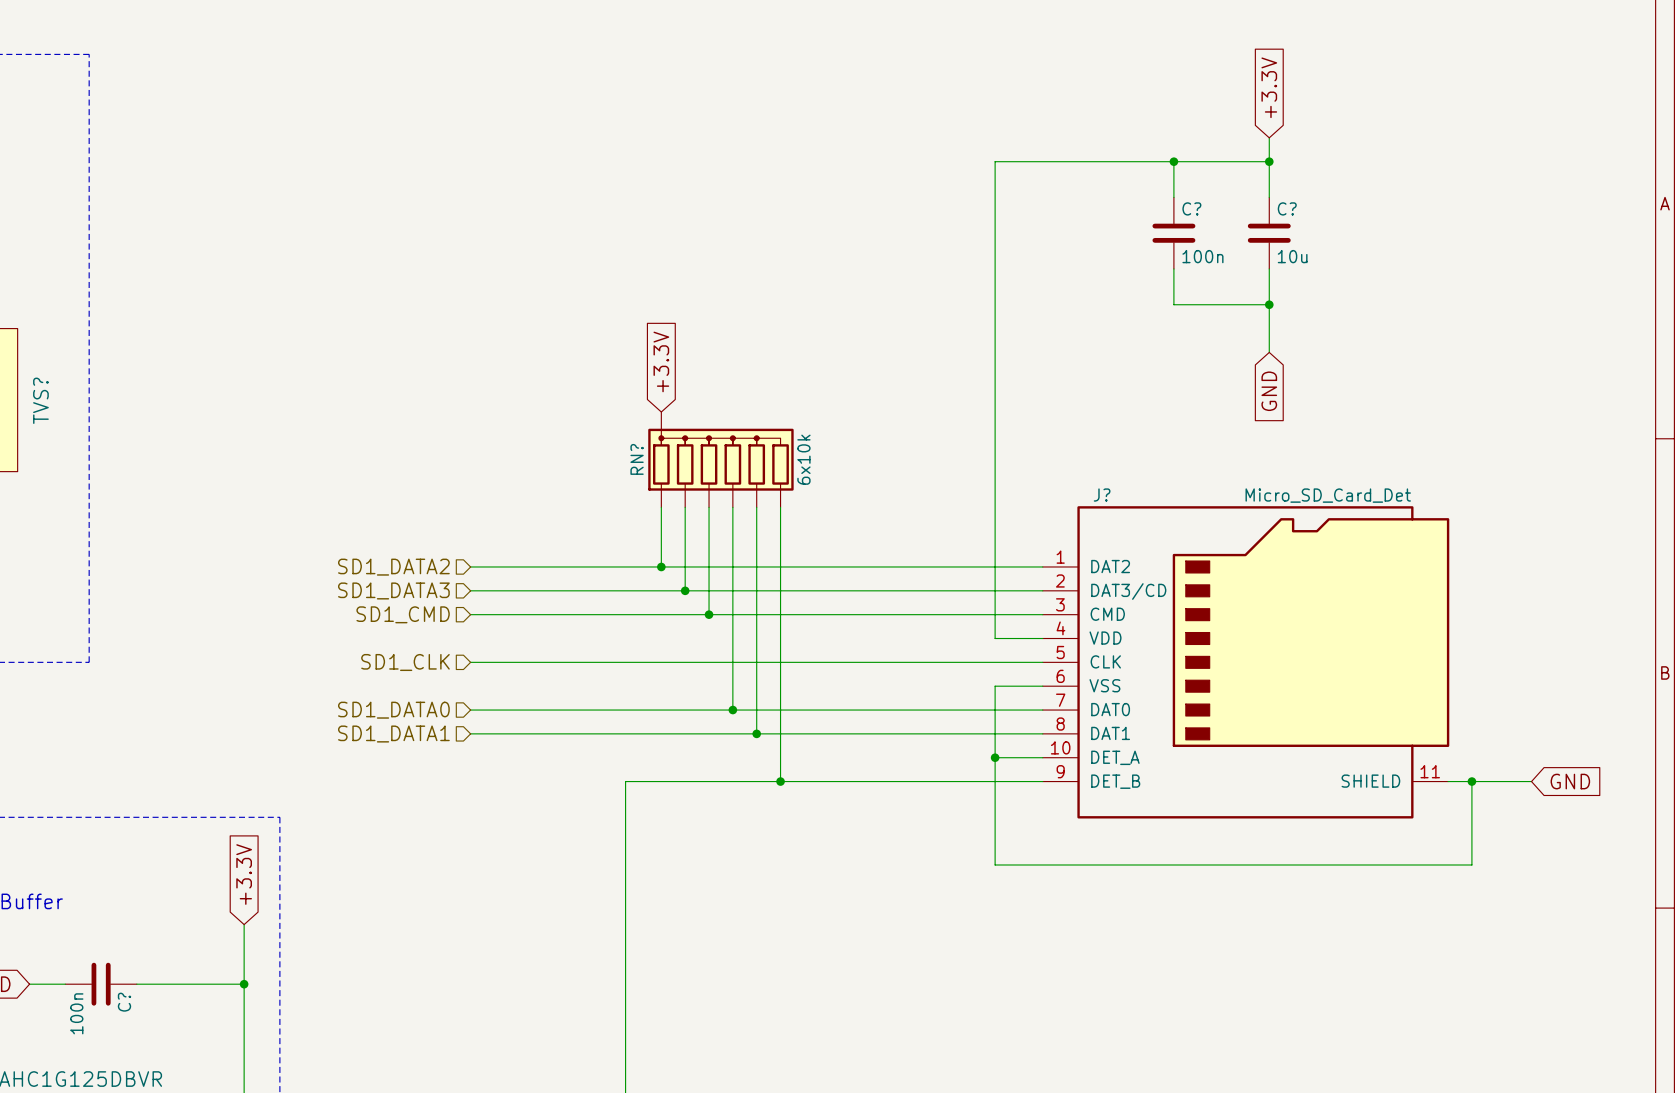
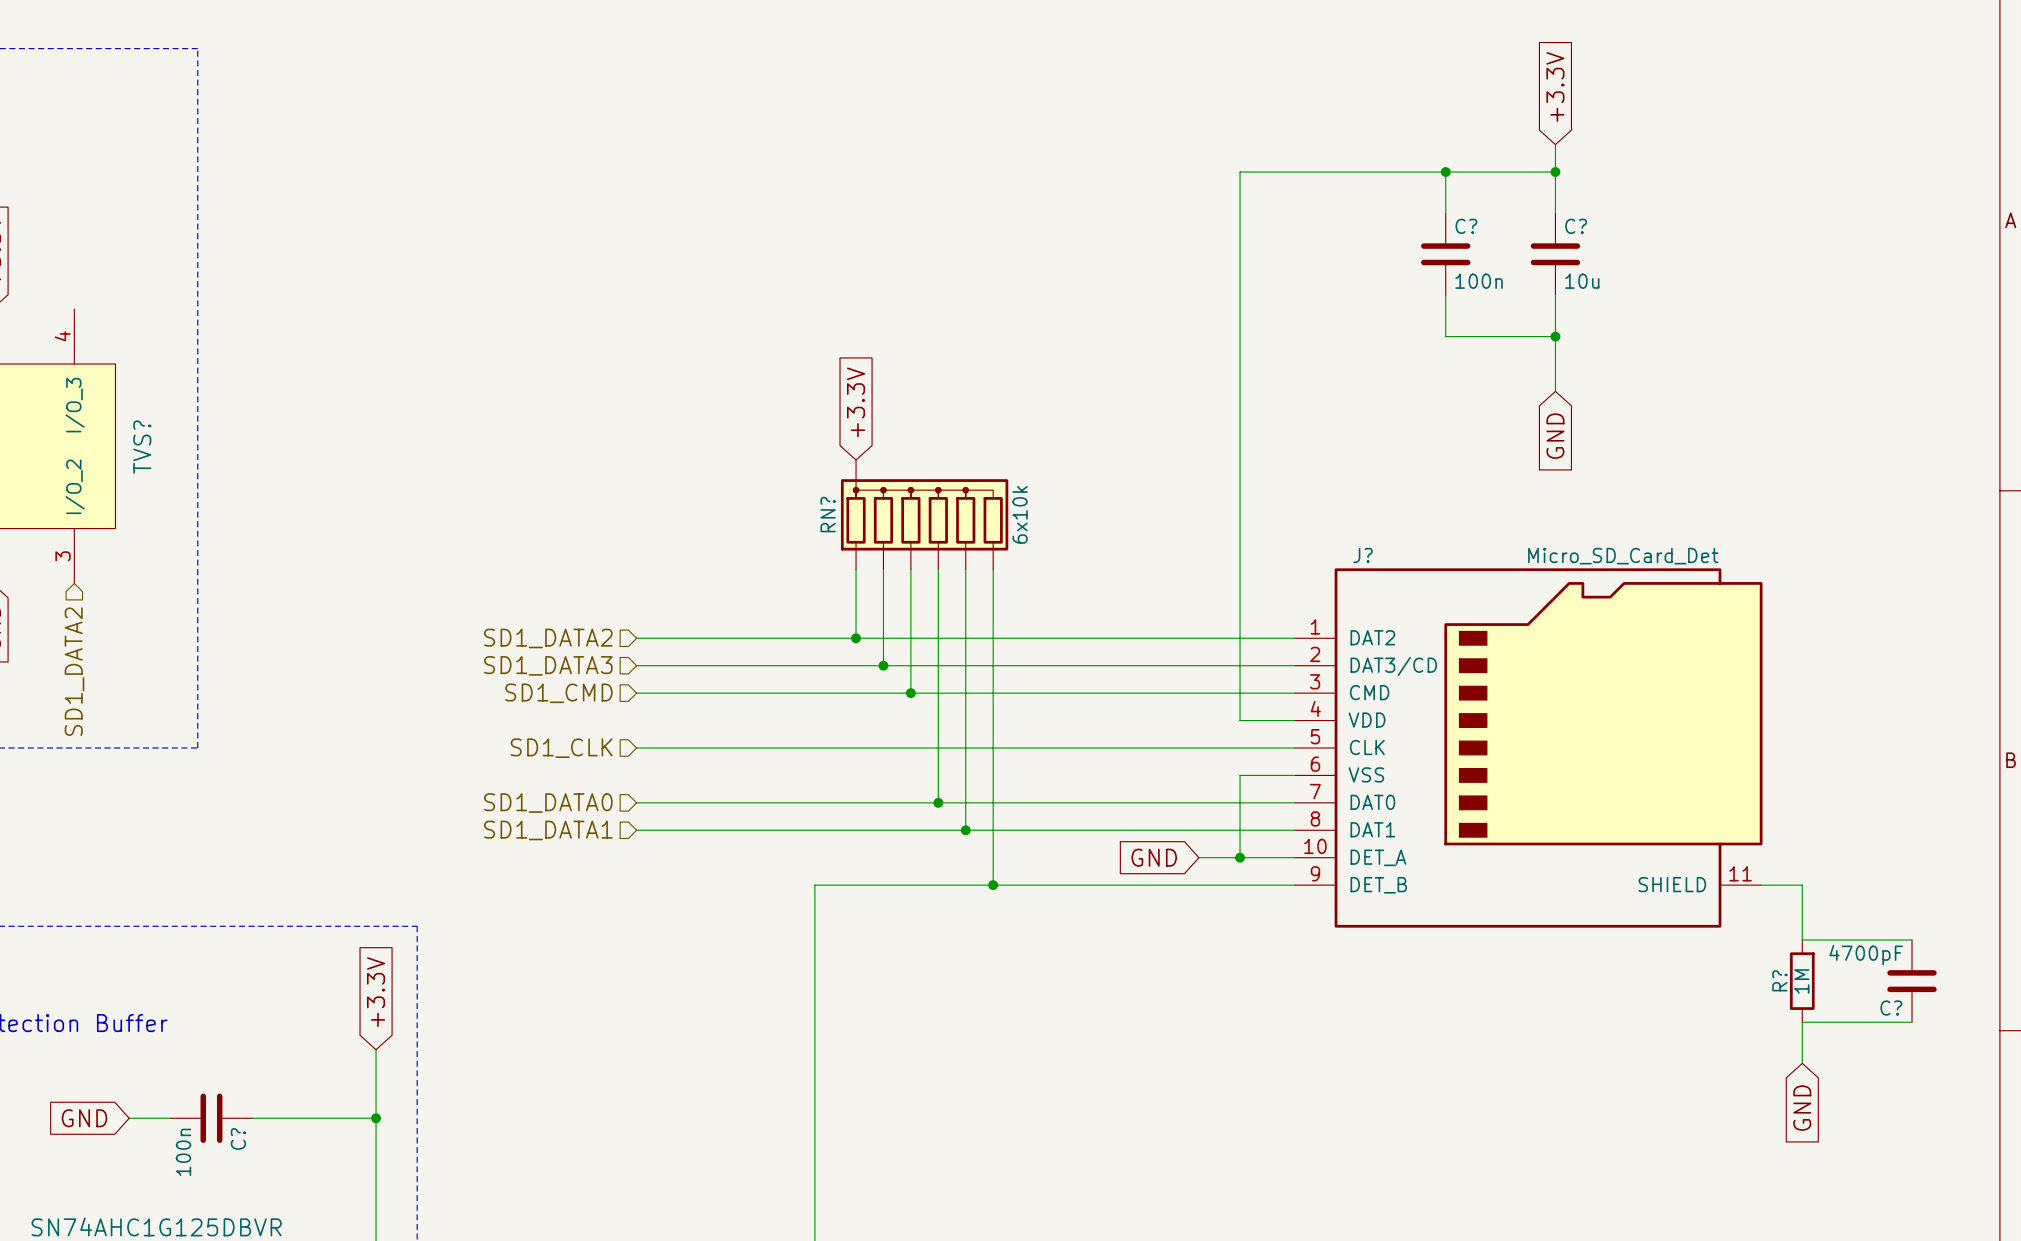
global label: none -> GND (1154, 857)
wire: (995, 757) (995, 864) (1471, 864) (1471, 781) -> (1240, 857) (1198, 857)
junction: (1471, 781) -> none
wire: (1483, 781) (1531, 781) -> (1802, 885) (1802, 939) (1912, 939)
global label rotation: 0° (1570, 781) -> 90° clockwise (1802, 1108)
global label position: GND (1570, 781) -> GND (1802, 1108)
R?: none -> 1M (1802, 981)
C?: none -> 4700pF (1912, 981)
wire: none -> (1912, 1022) (1802, 1022) (1802, 1063)

